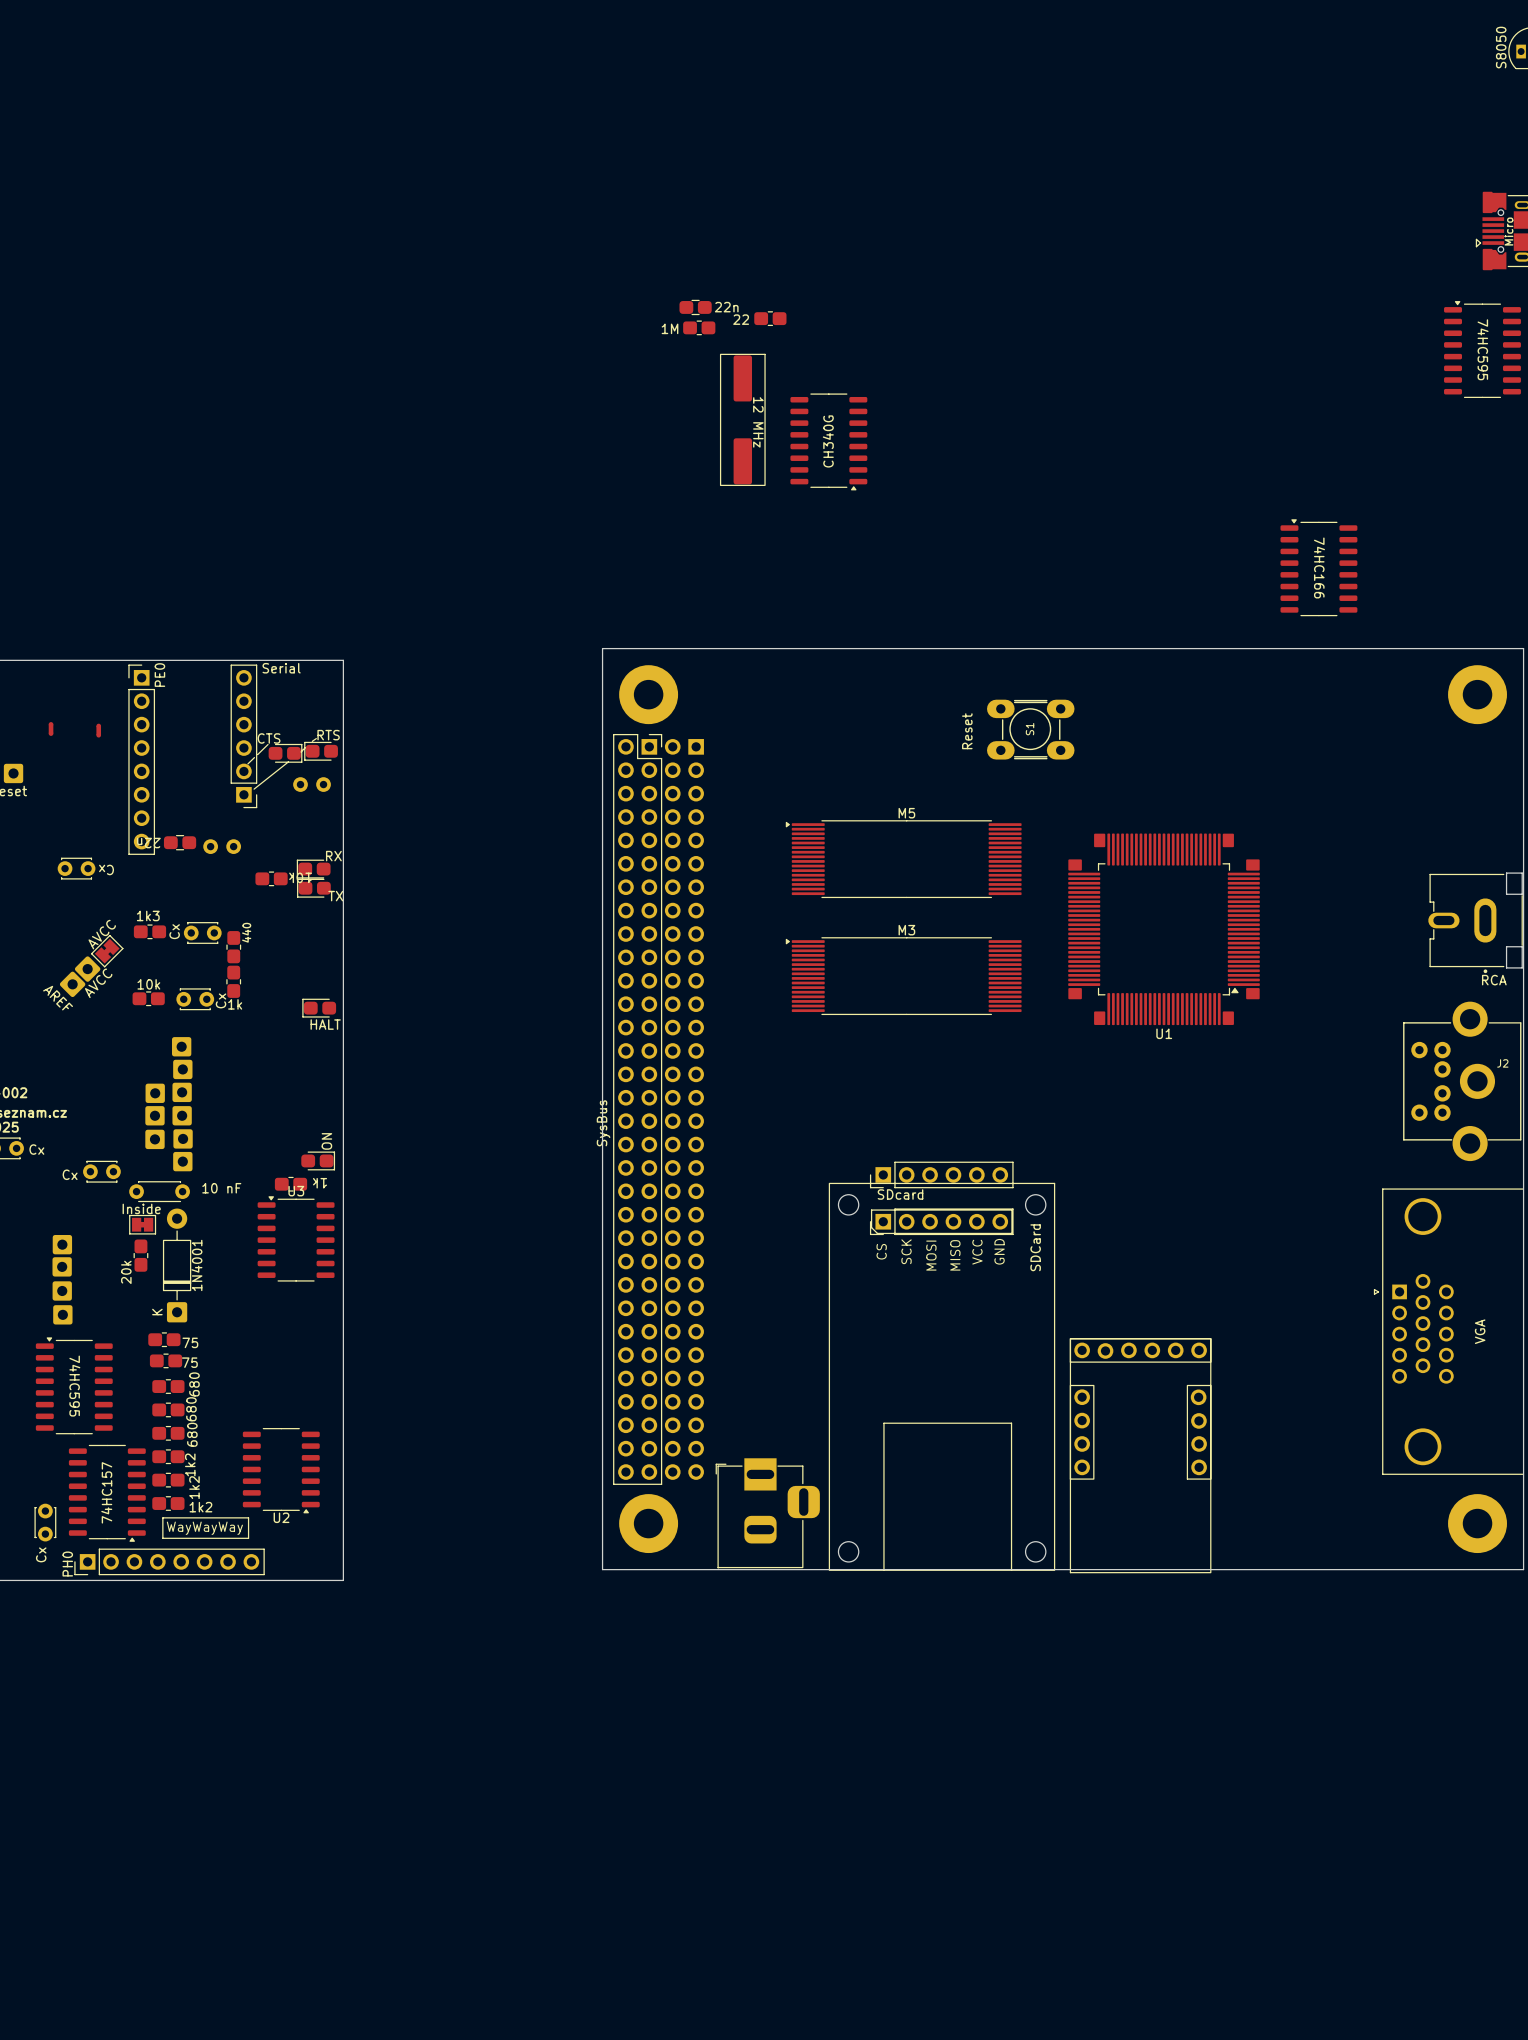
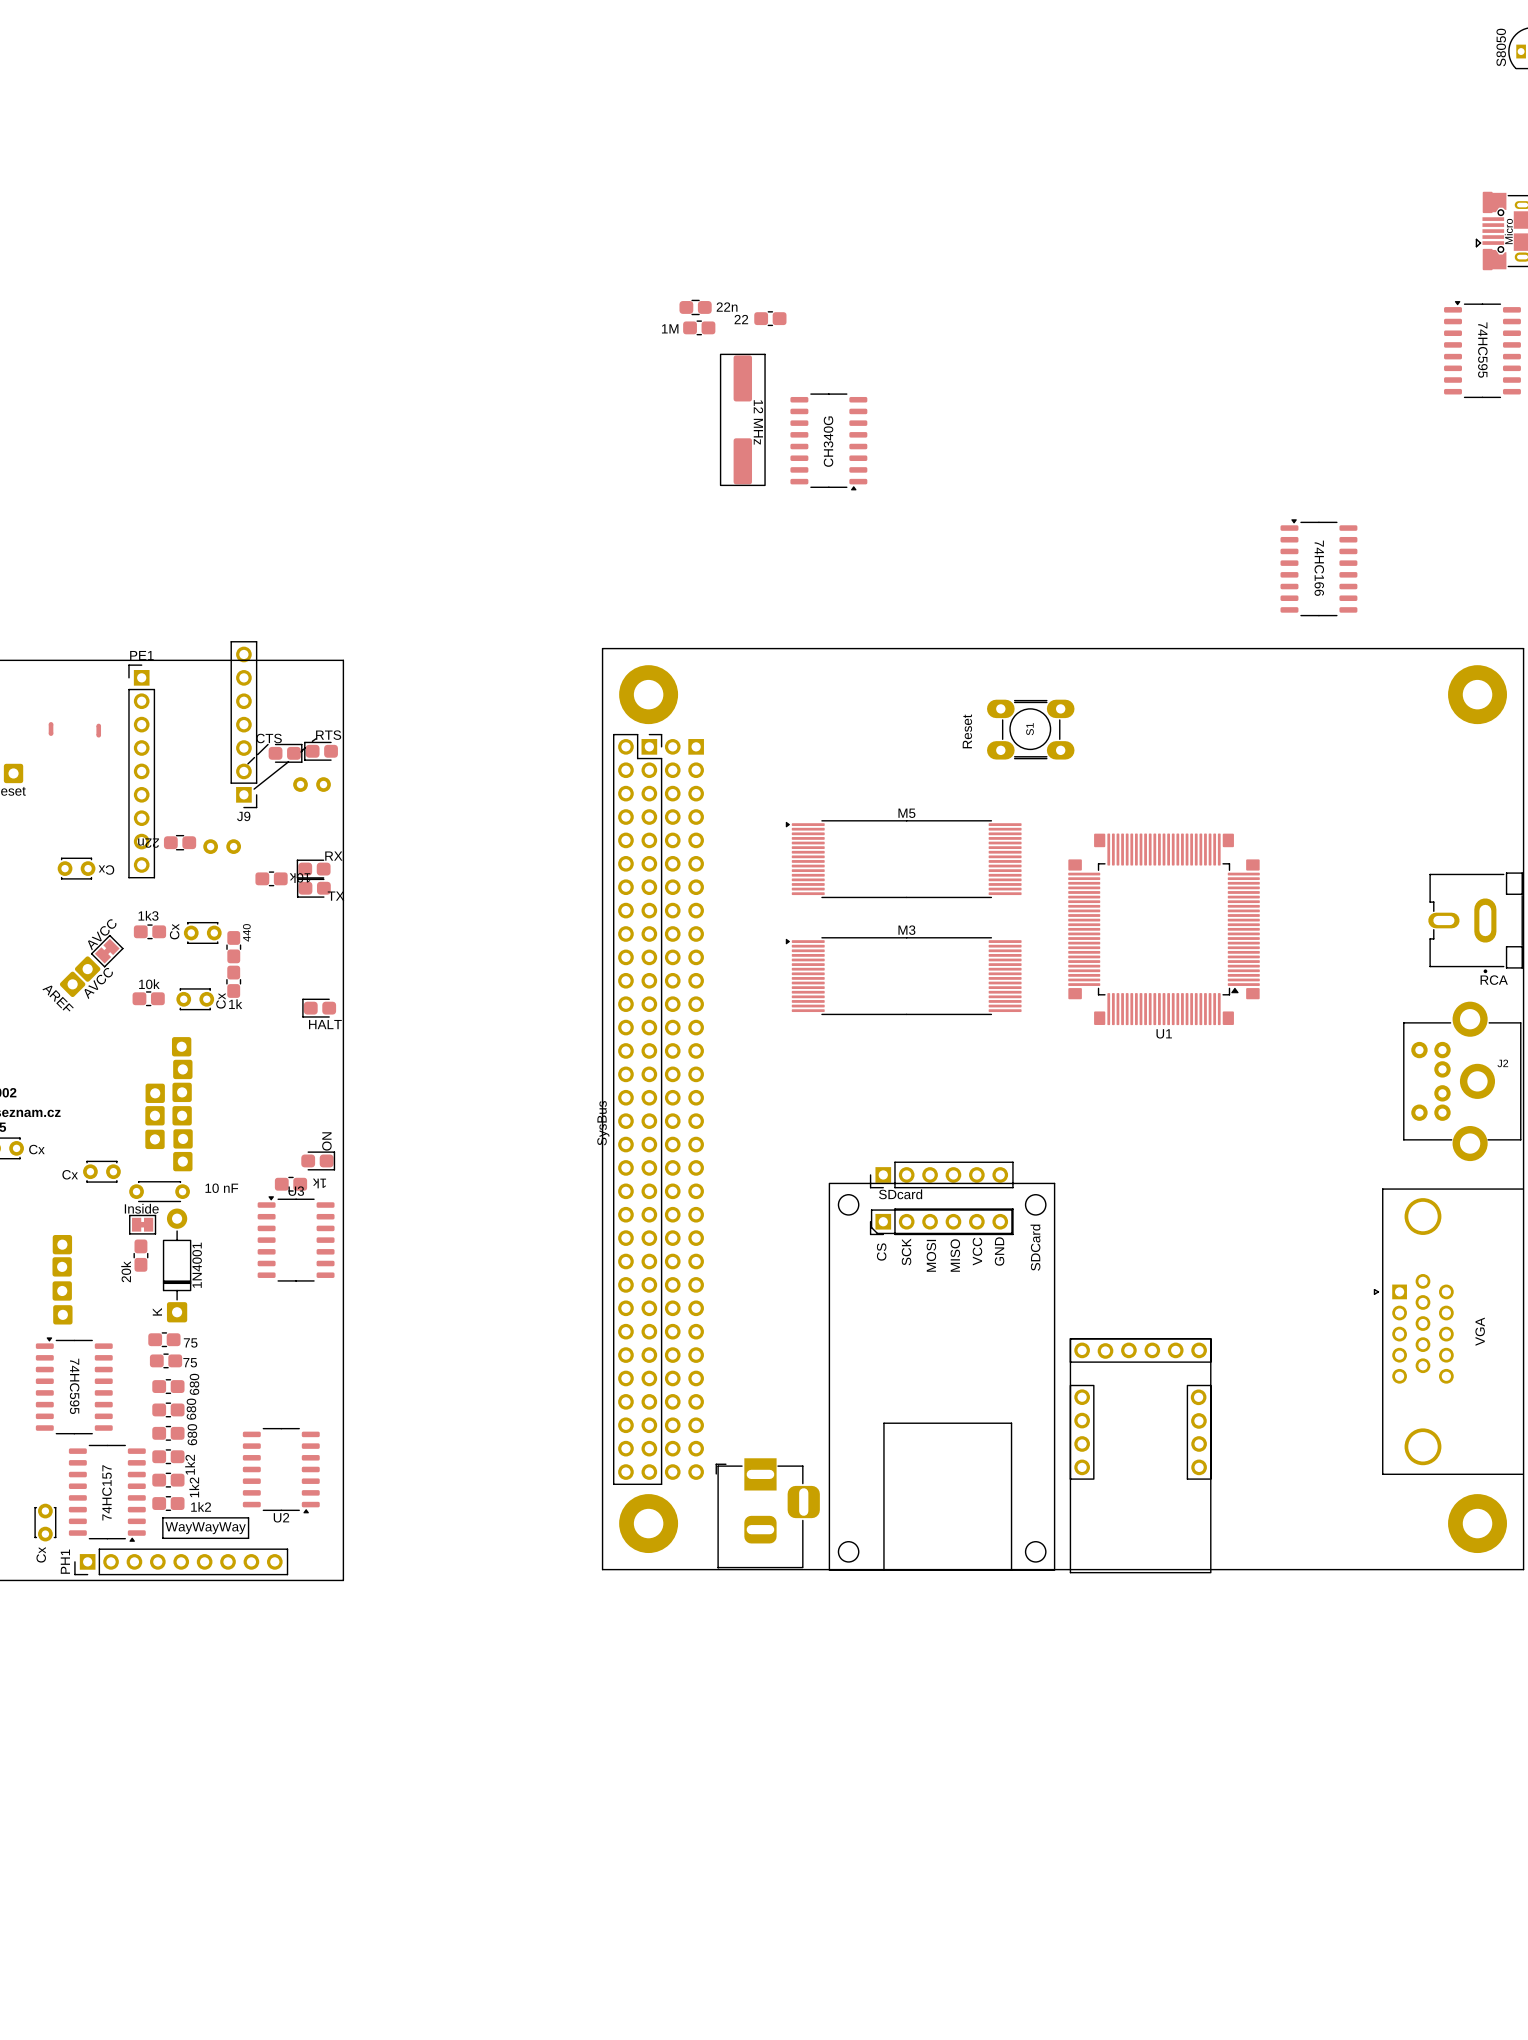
J9: none -> (243, 724)
part: Serial (243, 736) -> none
part: PE0 (141, 759) -> none
PE1: none -> (141, 771)
part: PH0 (169, 1561) -> none
PH1: none -> (181, 1561)

